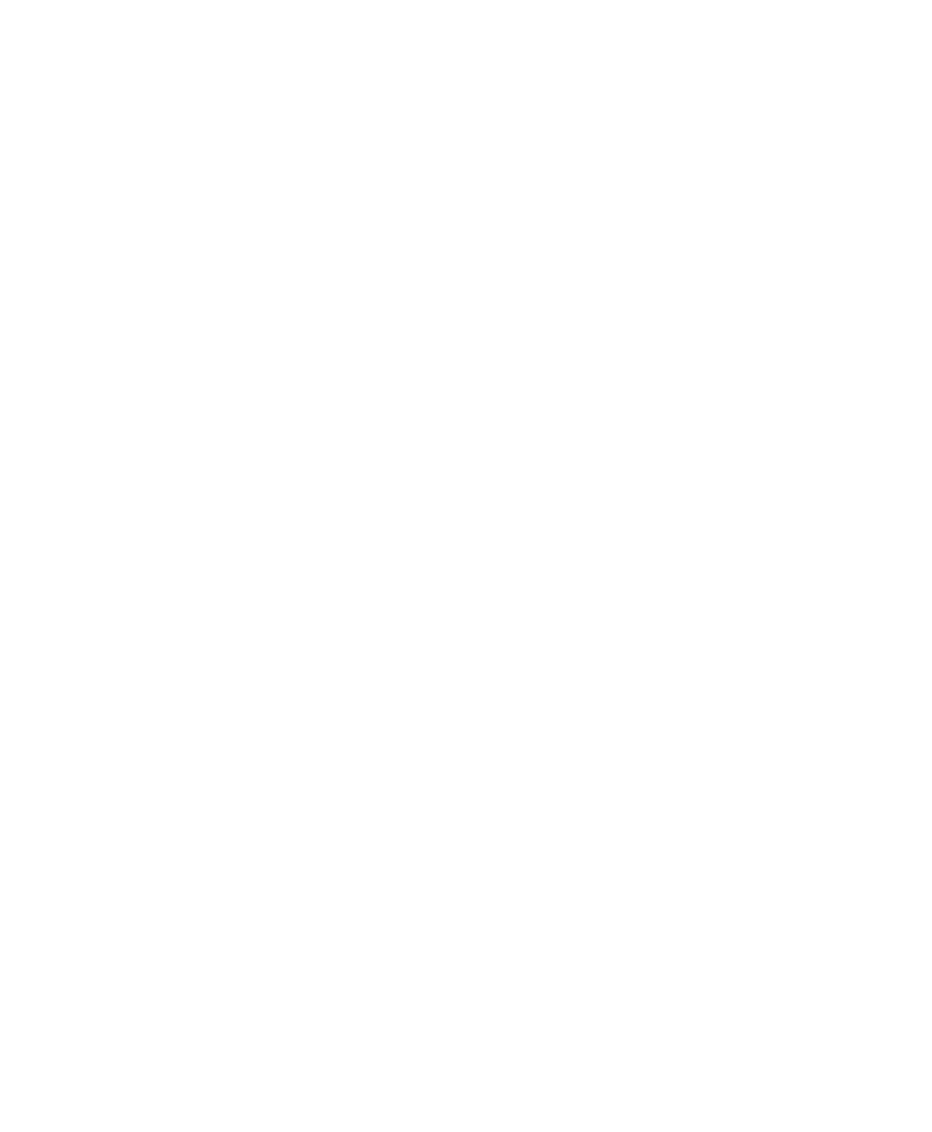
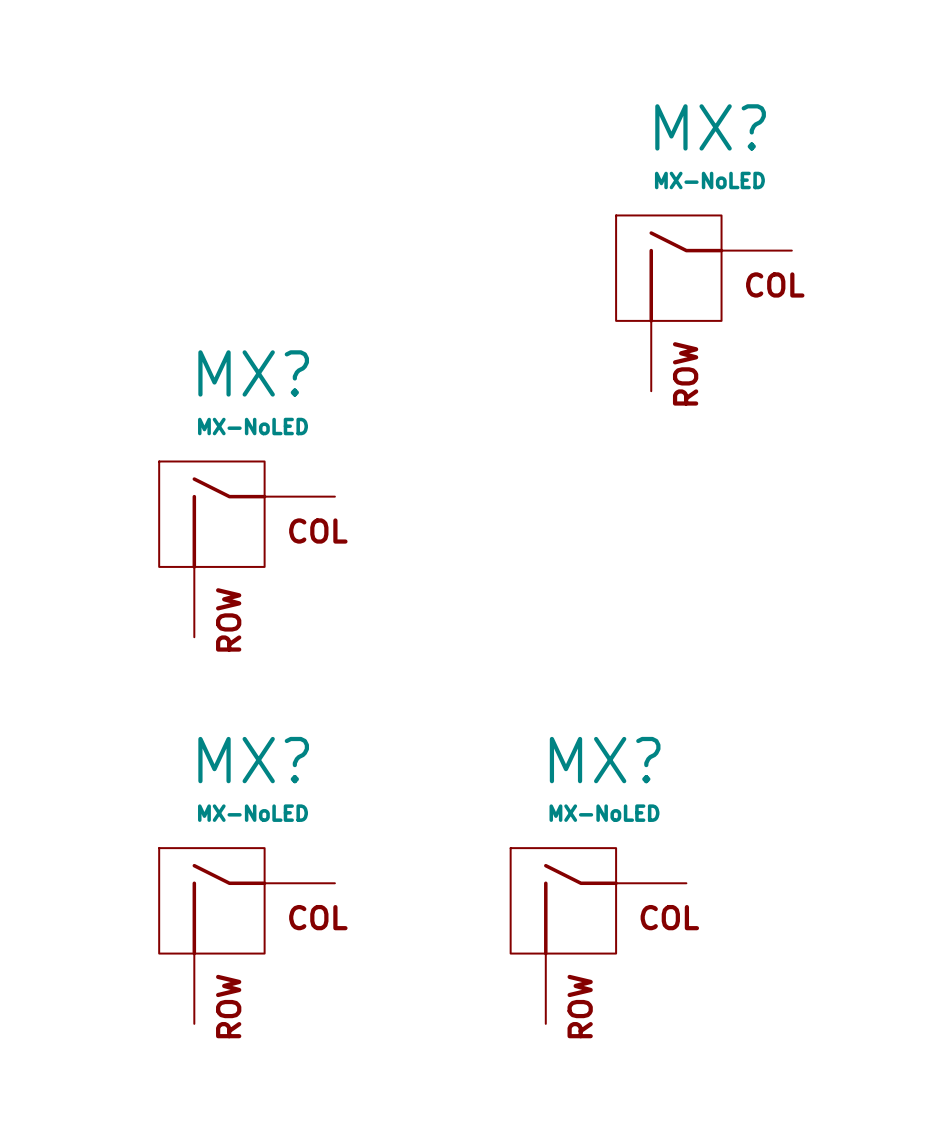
MX?: none -> MX-NoLED (703, 303)
MX?: none -> MX-NoLED (247, 549)
MX?: none -> MX-NoLED (247, 935)
MX?: none -> MX-NoLED (598, 935)

